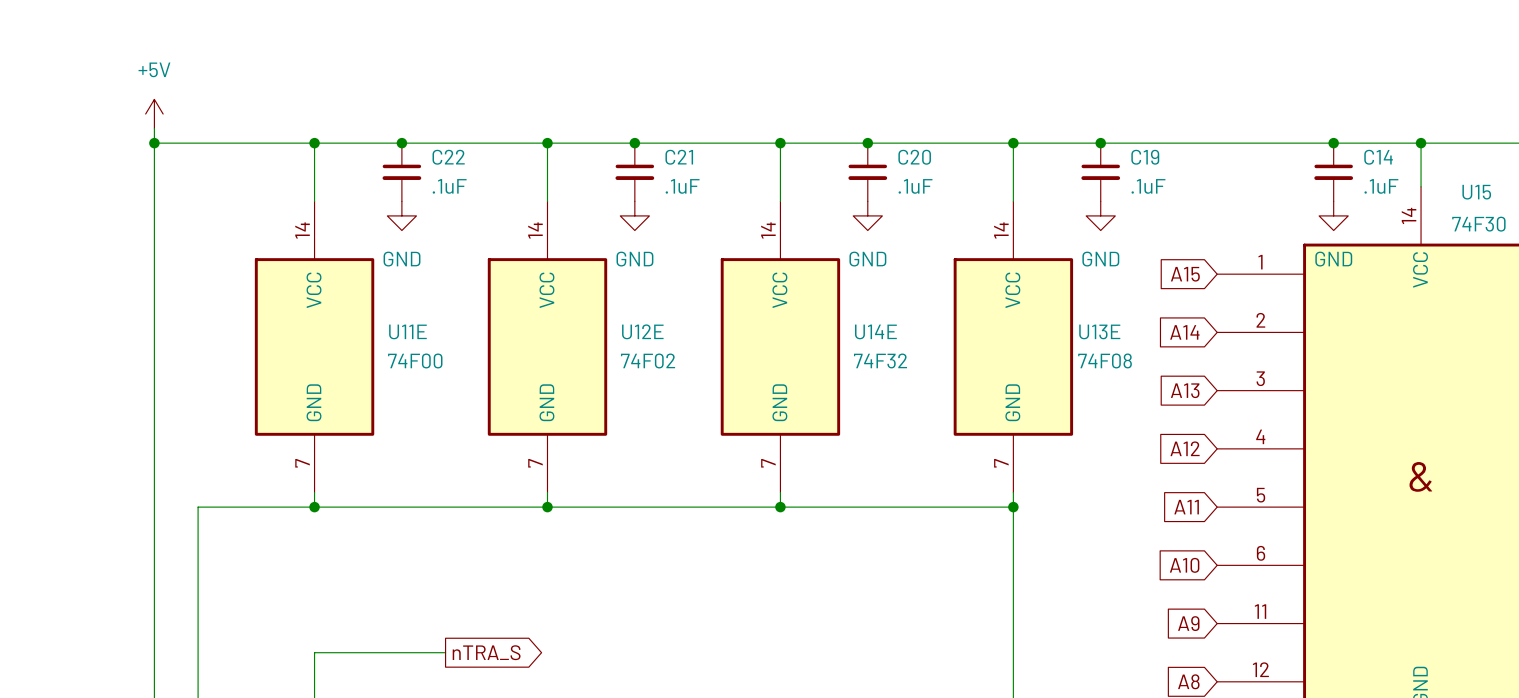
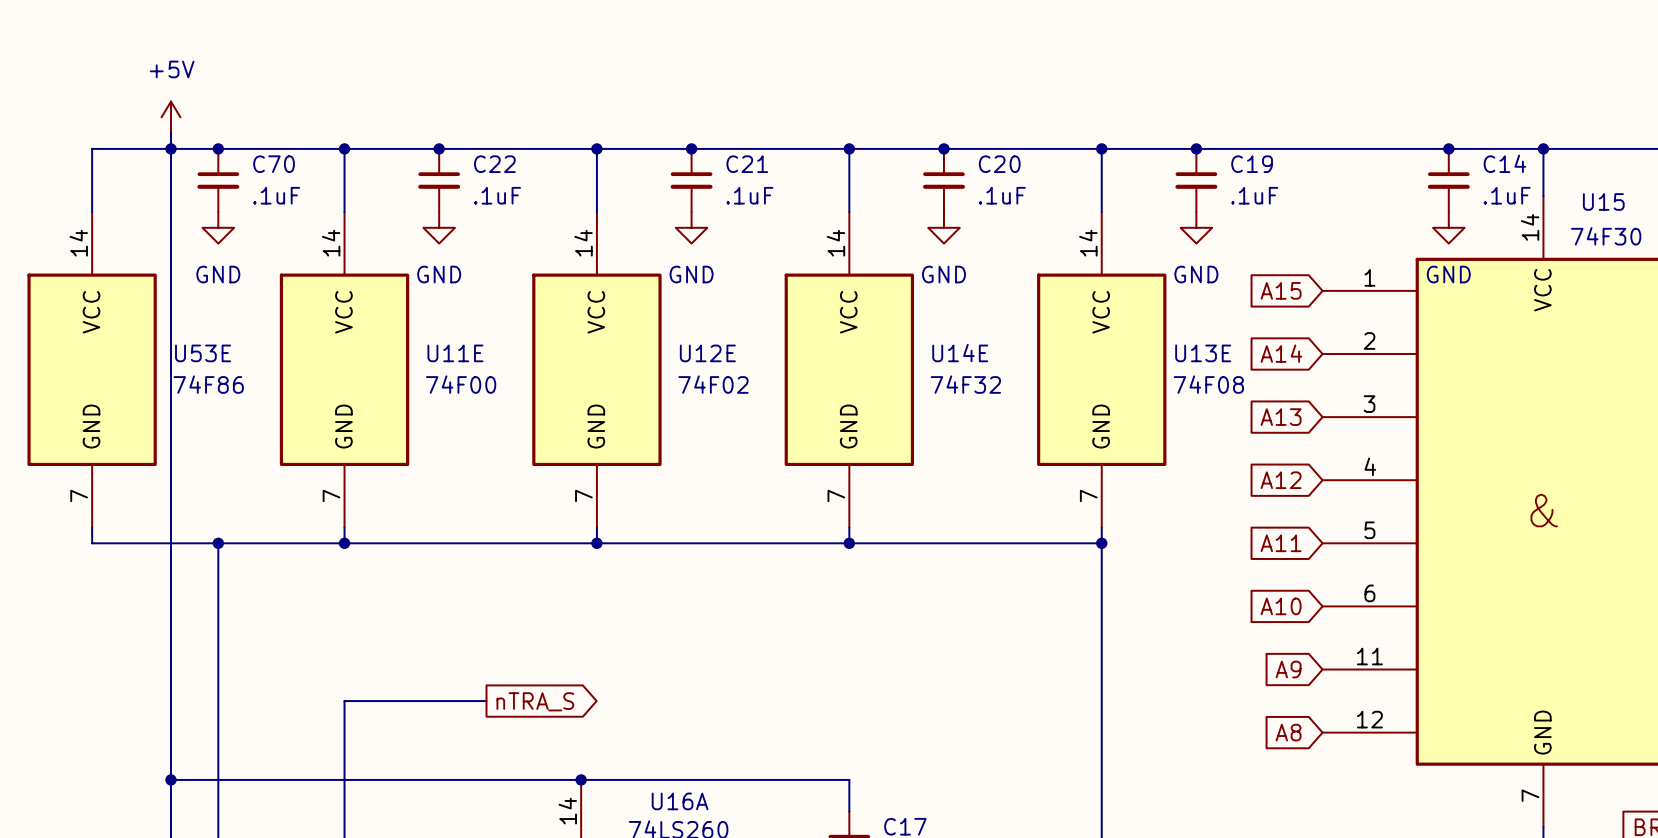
wire: none -> (170, 148) (92, 148) (92, 212)
junction: none -> (218, 148)
C70: none -> .1uF (218, 180)
power symbol: none -> GND (218, 227)
U53E: none -> 74F86 (92, 369)
wire: none -> (92, 527) (92, 543) (218, 543)
junction: none -> (218, 543)

